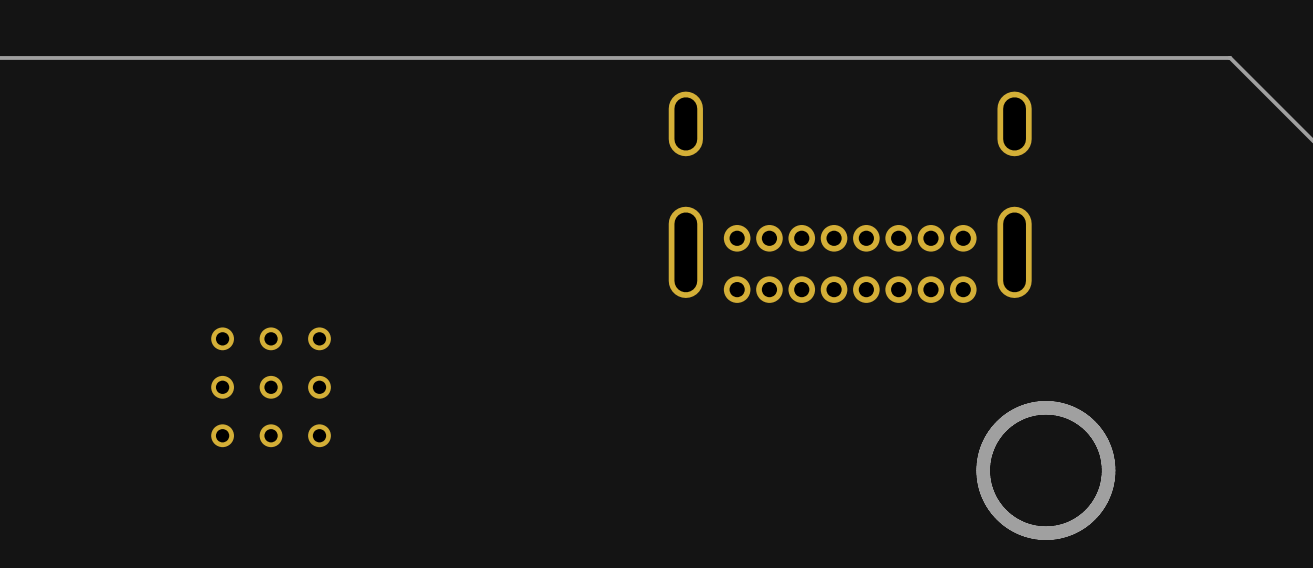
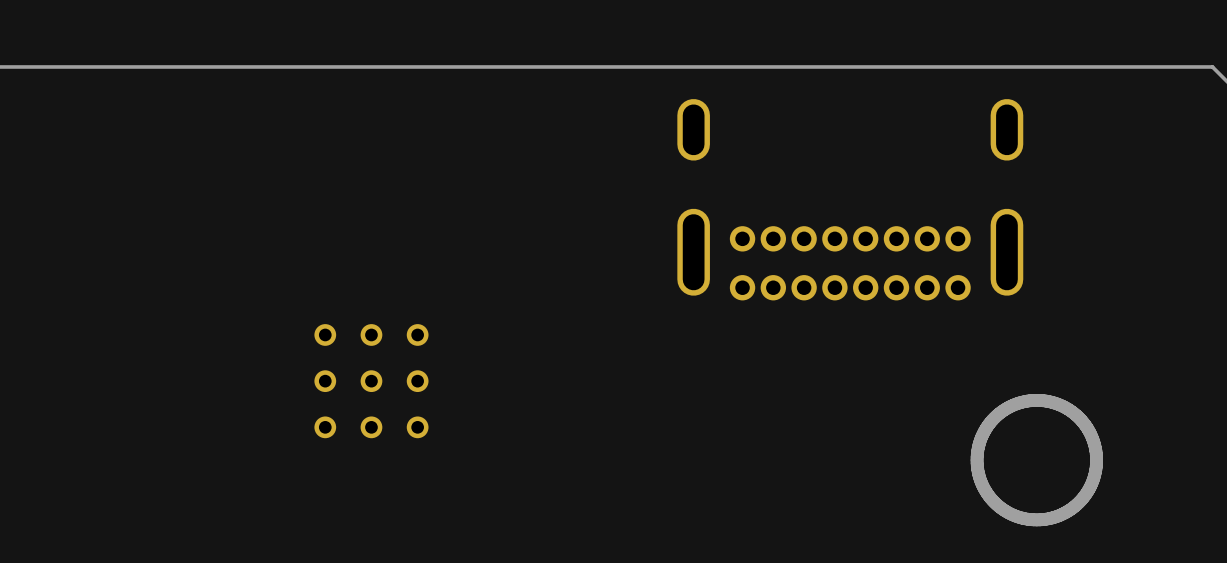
part position: (271, 387) -> (371, 381)

